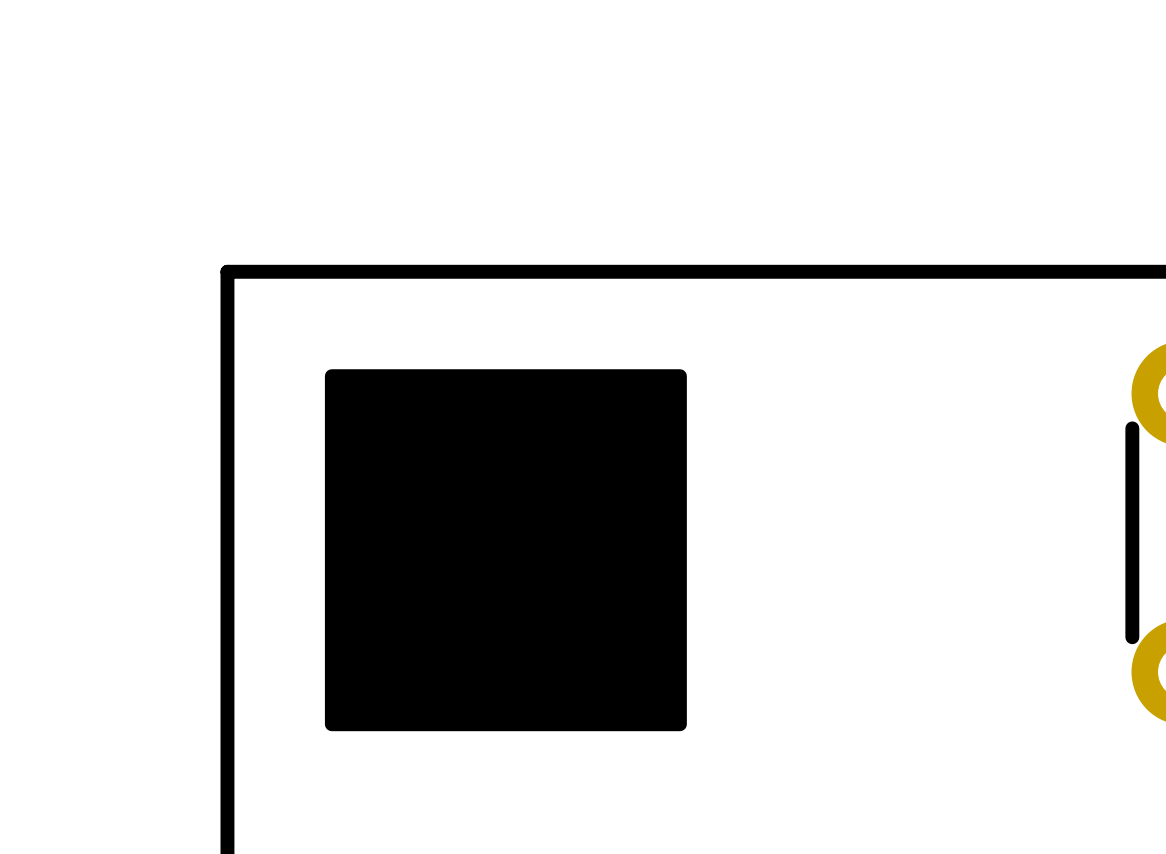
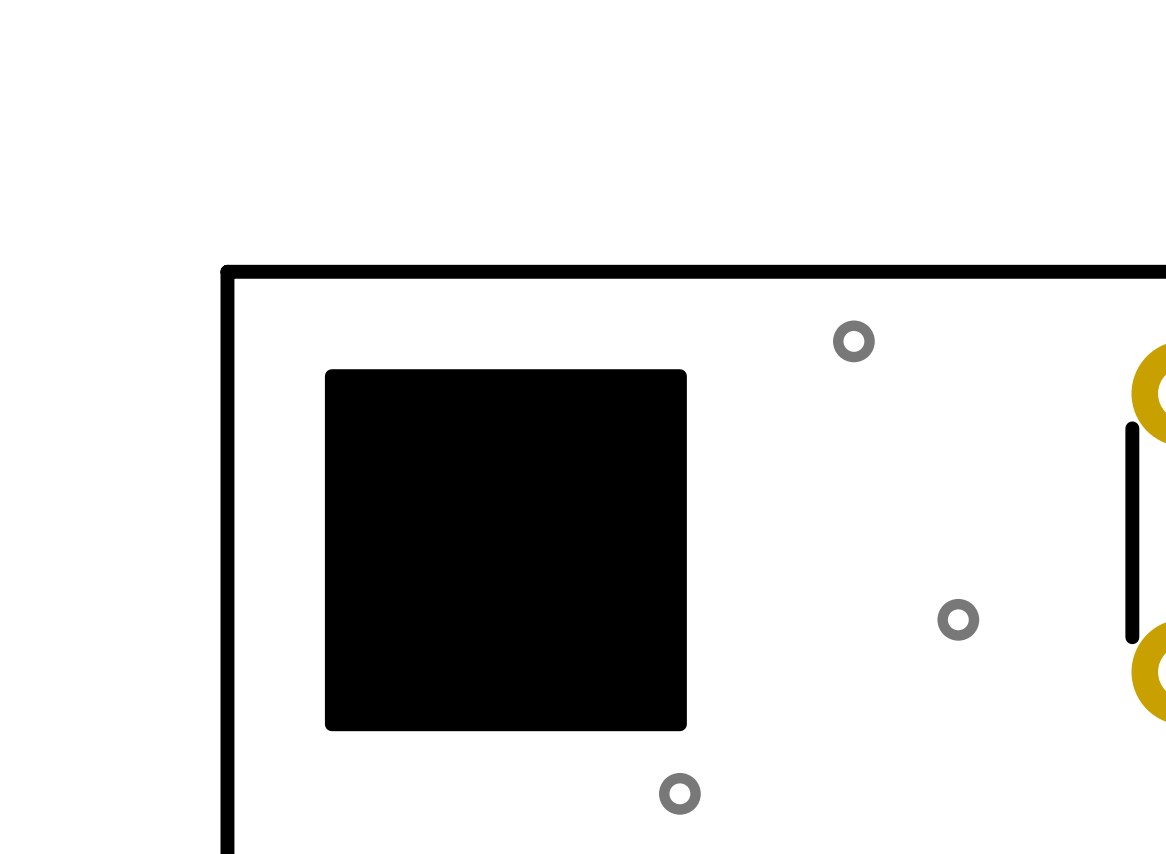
via: none -> (853, 341)
via: none -> (958, 619)
via: none -> (679, 793)

